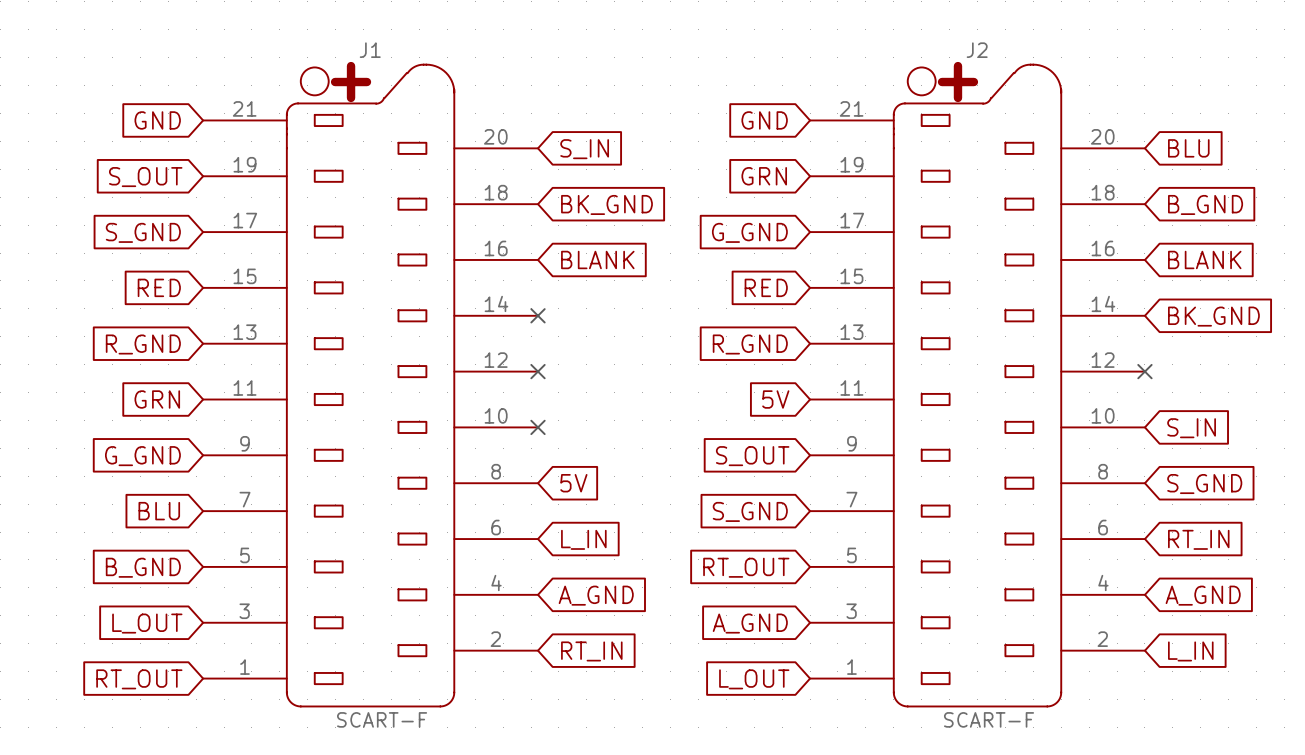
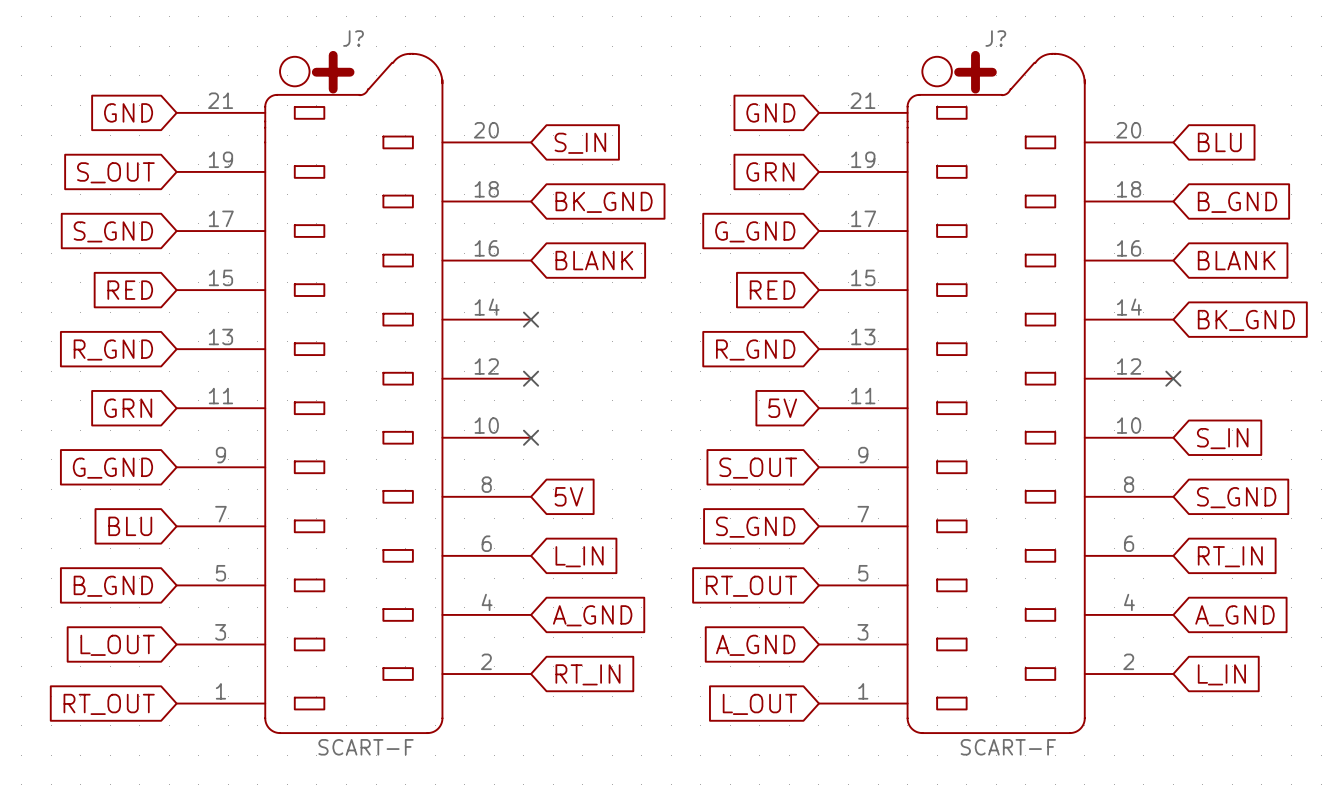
J1 name: J1 (370, 50) -> J? (353, 38)
J2 name: J2 (977, 50) -> J? (995, 38)

